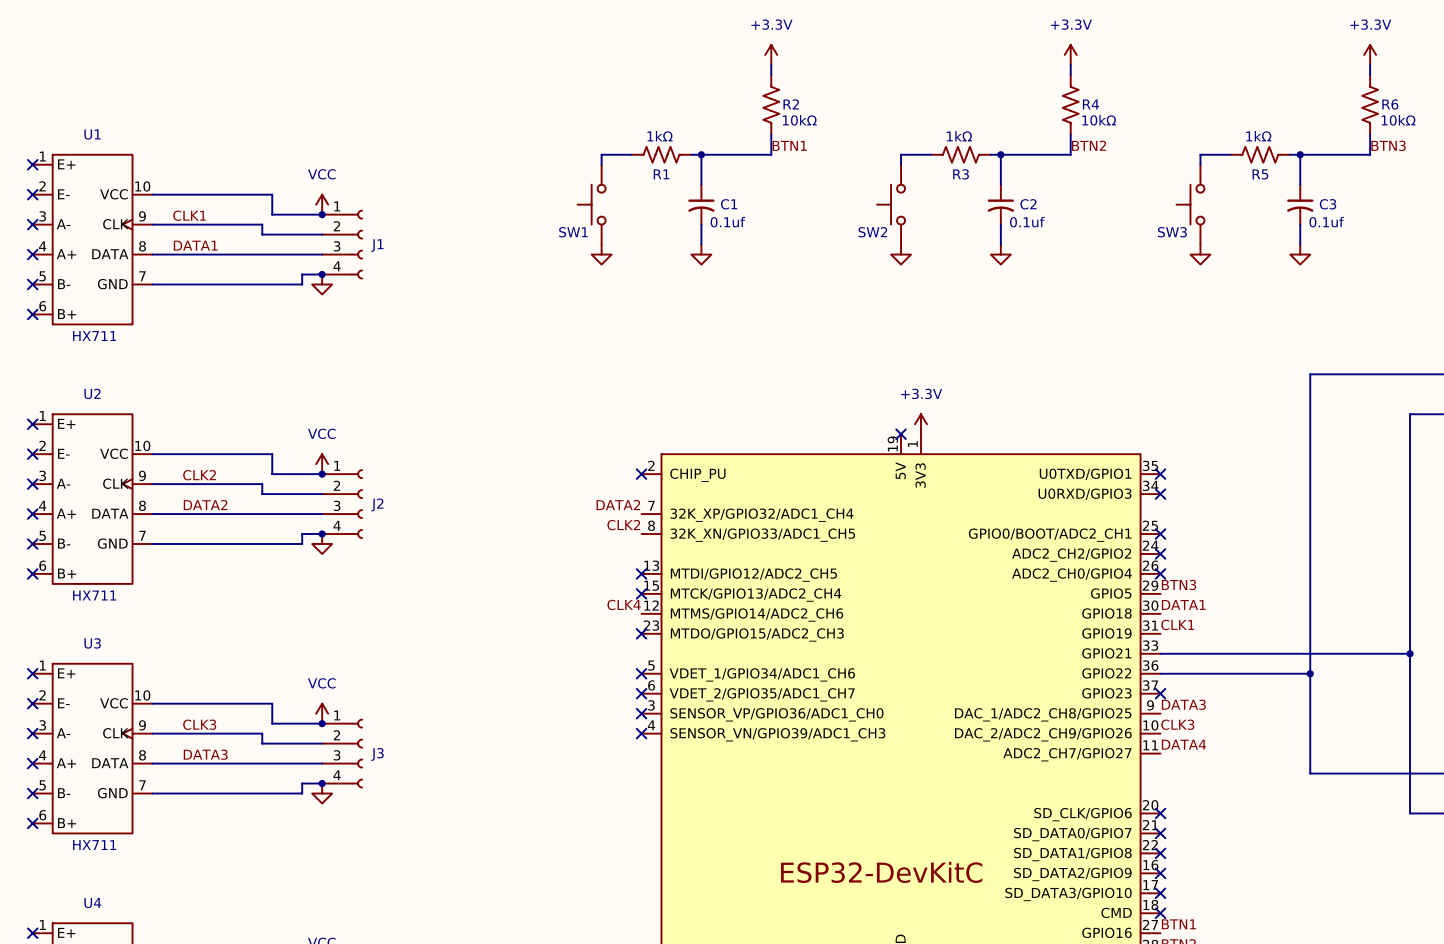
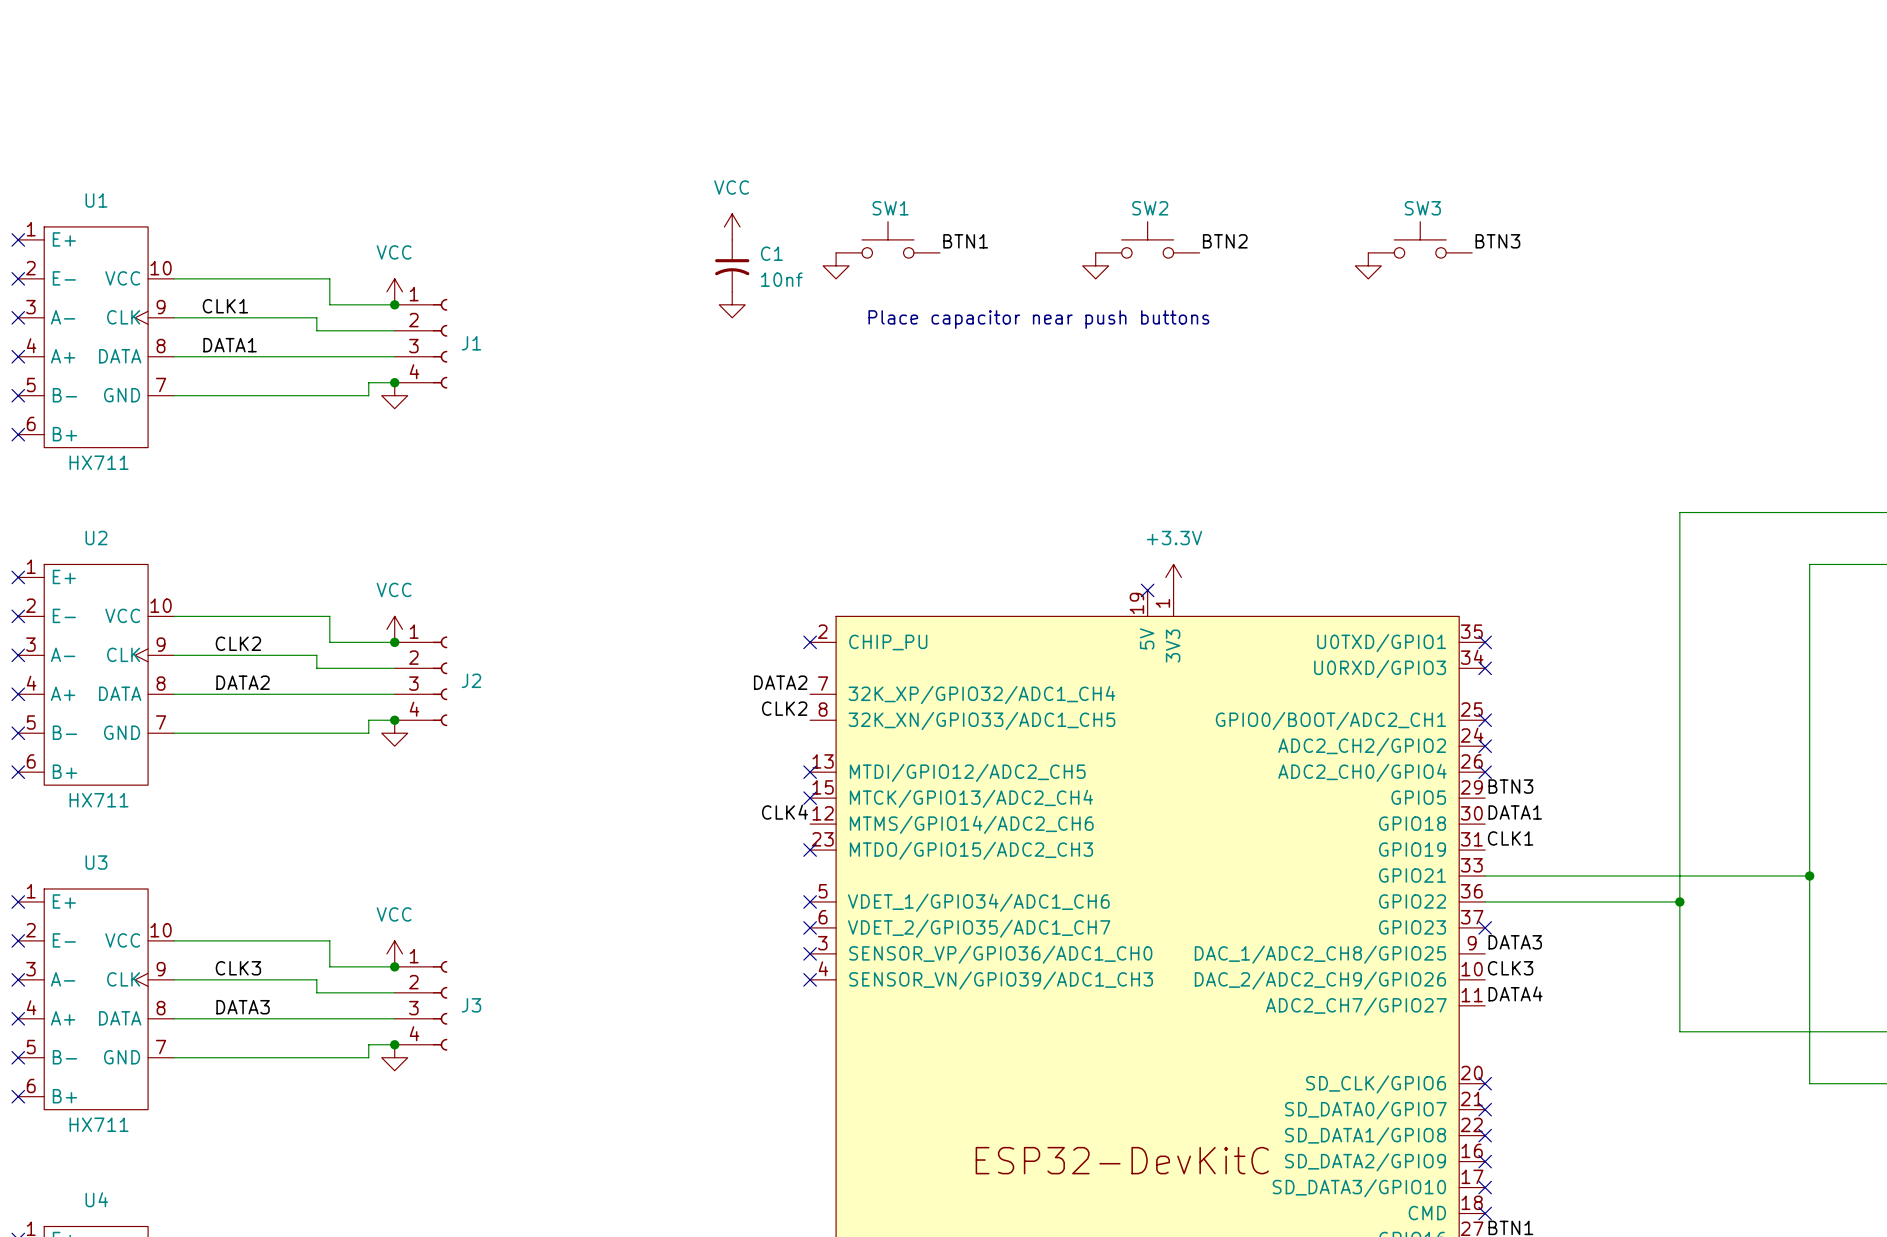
power symbol: +3.3V (771, 54) -> none
power symbol: +3.3V (1070, 54) -> none
power symbol: +3.3V (1370, 54) -> none
wire: (771, 64) (771, 74) -> none
wire: (1070, 64) (1070, 74) -> none
wire: (1370, 64) (1370, 74) -> none
R2: 10kΩ (771, 104) -> none
R4: 10kΩ (1070, 104) -> none
R6: 10kΩ (1370, 104) -> none
wire: (771, 134) (771, 154) (691, 154) -> none
wire: (1070, 134) (1070, 154) (990, 154) -> none
wire: (1370, 134) (1370, 154) (1290, 154) -> none
label position: BTN1 (789, 145) -> BTN1 (965, 241)
label position: BTN2 (1089, 145) -> BTN2 (1225, 241)
label: BTN3 (1388, 145) -> none
power symbol: none -> VCC (732, 226)
wire: (631, 154) (601, 154) (601, 164) -> none
R1: 1kΩ (661, 154) -> none
wire: (701, 154) (701, 184) -> none
junction: (701, 154) -> none
wire: (930, 154) (901, 154) (901, 164) -> none
R3: 1kΩ (960, 154) -> none
wire: (1000, 154) (1000, 184) -> none
junction: (1000, 154) -> none
wire: (1230, 154) (1200, 154) (1200, 164) -> none
R5: 1kΩ (1260, 154) -> none
wire: (1300, 154) (1300, 184) -> none
junction: (1300, 154) -> none
label: none -> BTN3 (1497, 241)
power symbol: none -> (836, 265)
power symbol: none -> (1095, 265)
power symbol: none -> (1368, 265)
SW1 rotation: 0° (591, 204) -> 90° clockwise (888, 239)
SW1 position: (591, 204) -> (888, 239)
C1 position: (701, 204) -> (732, 265)
C1 name position: C1 (729, 204) -> C1 (771, 253)
SW2 rotation: 0° (891, 204) -> 90° clockwise (1147, 239)
C2: 0.1uf (1000, 204) -> none
SW3 rotation: 0° (1190, 204) -> 90° clockwise (1420, 239)
SW3 position: (1190, 204) -> (1420, 239)
C3: 0.1uf (1300, 204) -> none
C1 value: 0.1uf (727, 222) -> 10nf (781, 279)
wire: (701, 224) (701, 244) -> none
wire: (1000, 224) (1000, 244) -> none
wire: (1300, 224) (1300, 244) -> none
text: none -> Place capacitor near push buttons (1038, 319)
SW1 name position: SW1 (573, 232) -> SW1 (890, 208)
SW2 name position: SW2 (872, 232) -> SW2 (1150, 208)
SW3 name position: SW3 (1172, 232) -> SW3 (1422, 208)
power symbol position: (601, 254) -> (732, 304)
power symbol: (701, 254) -> none
power symbol: (901, 254) -> none
power symbol: (1000, 254) -> none
power symbol: (1200, 254) -> none
power symbol: (1300, 254) -> none

